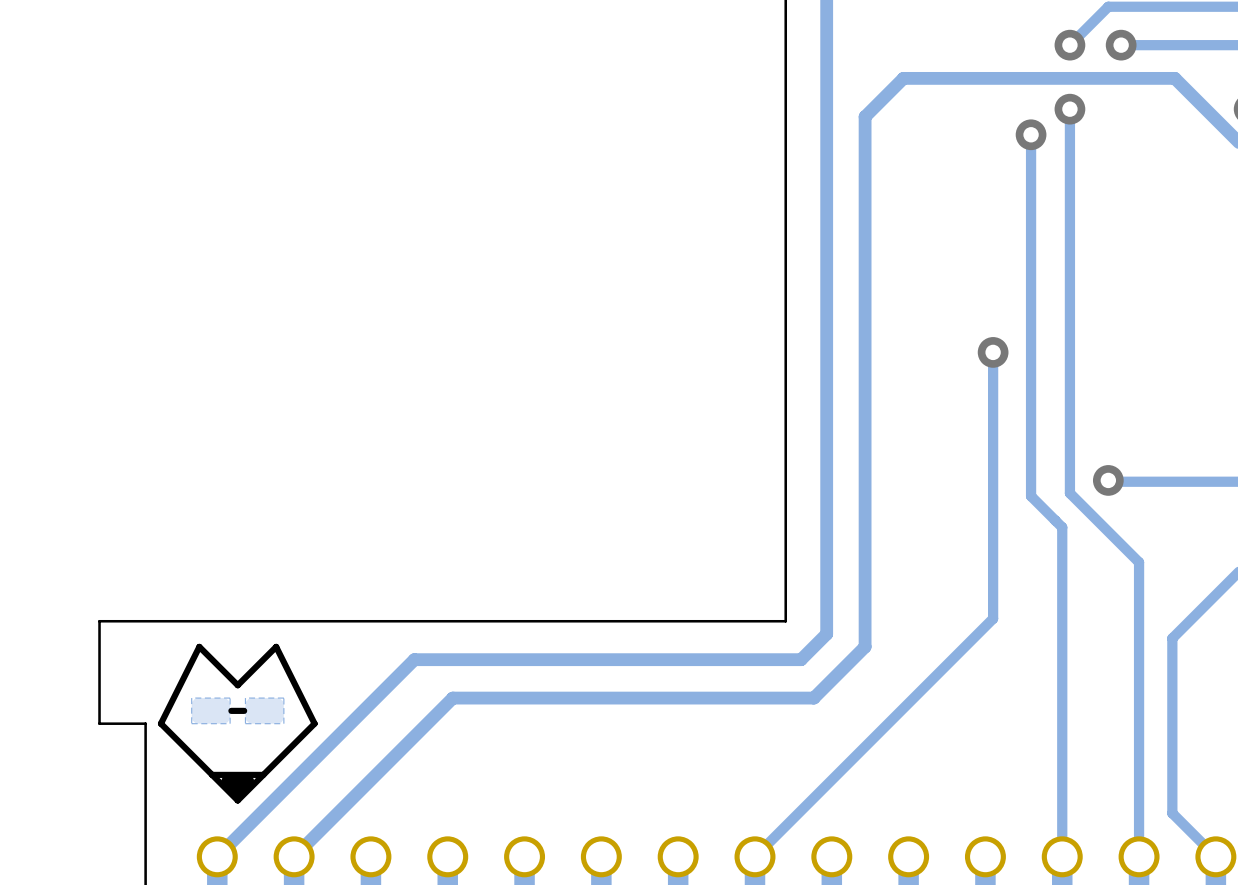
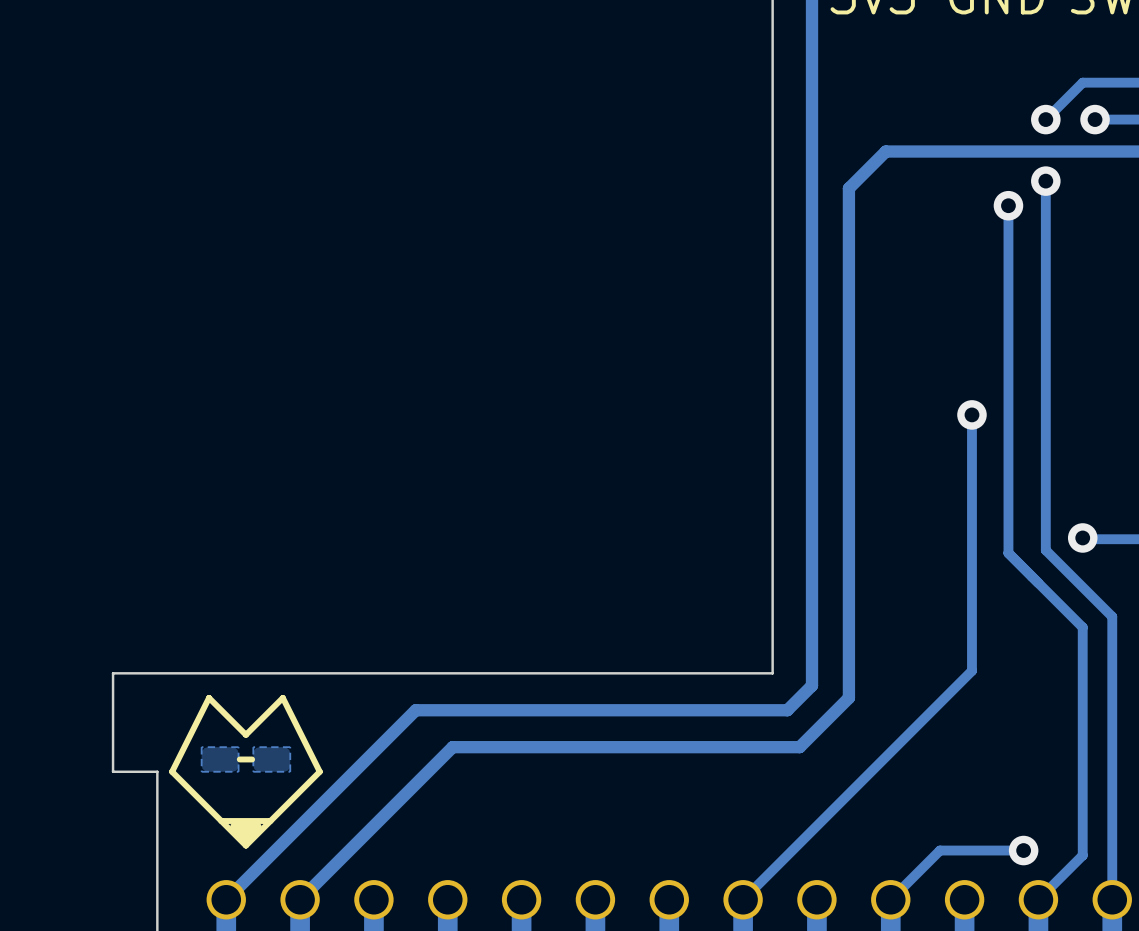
track: (1062, 527) (1062, 856) -> (1038, 583) (1082, 627) (1082, 855) (1038, 899)
track: none -> (1023, 850) (939, 850) (890, 899)
via: none -> (1023, 850)

